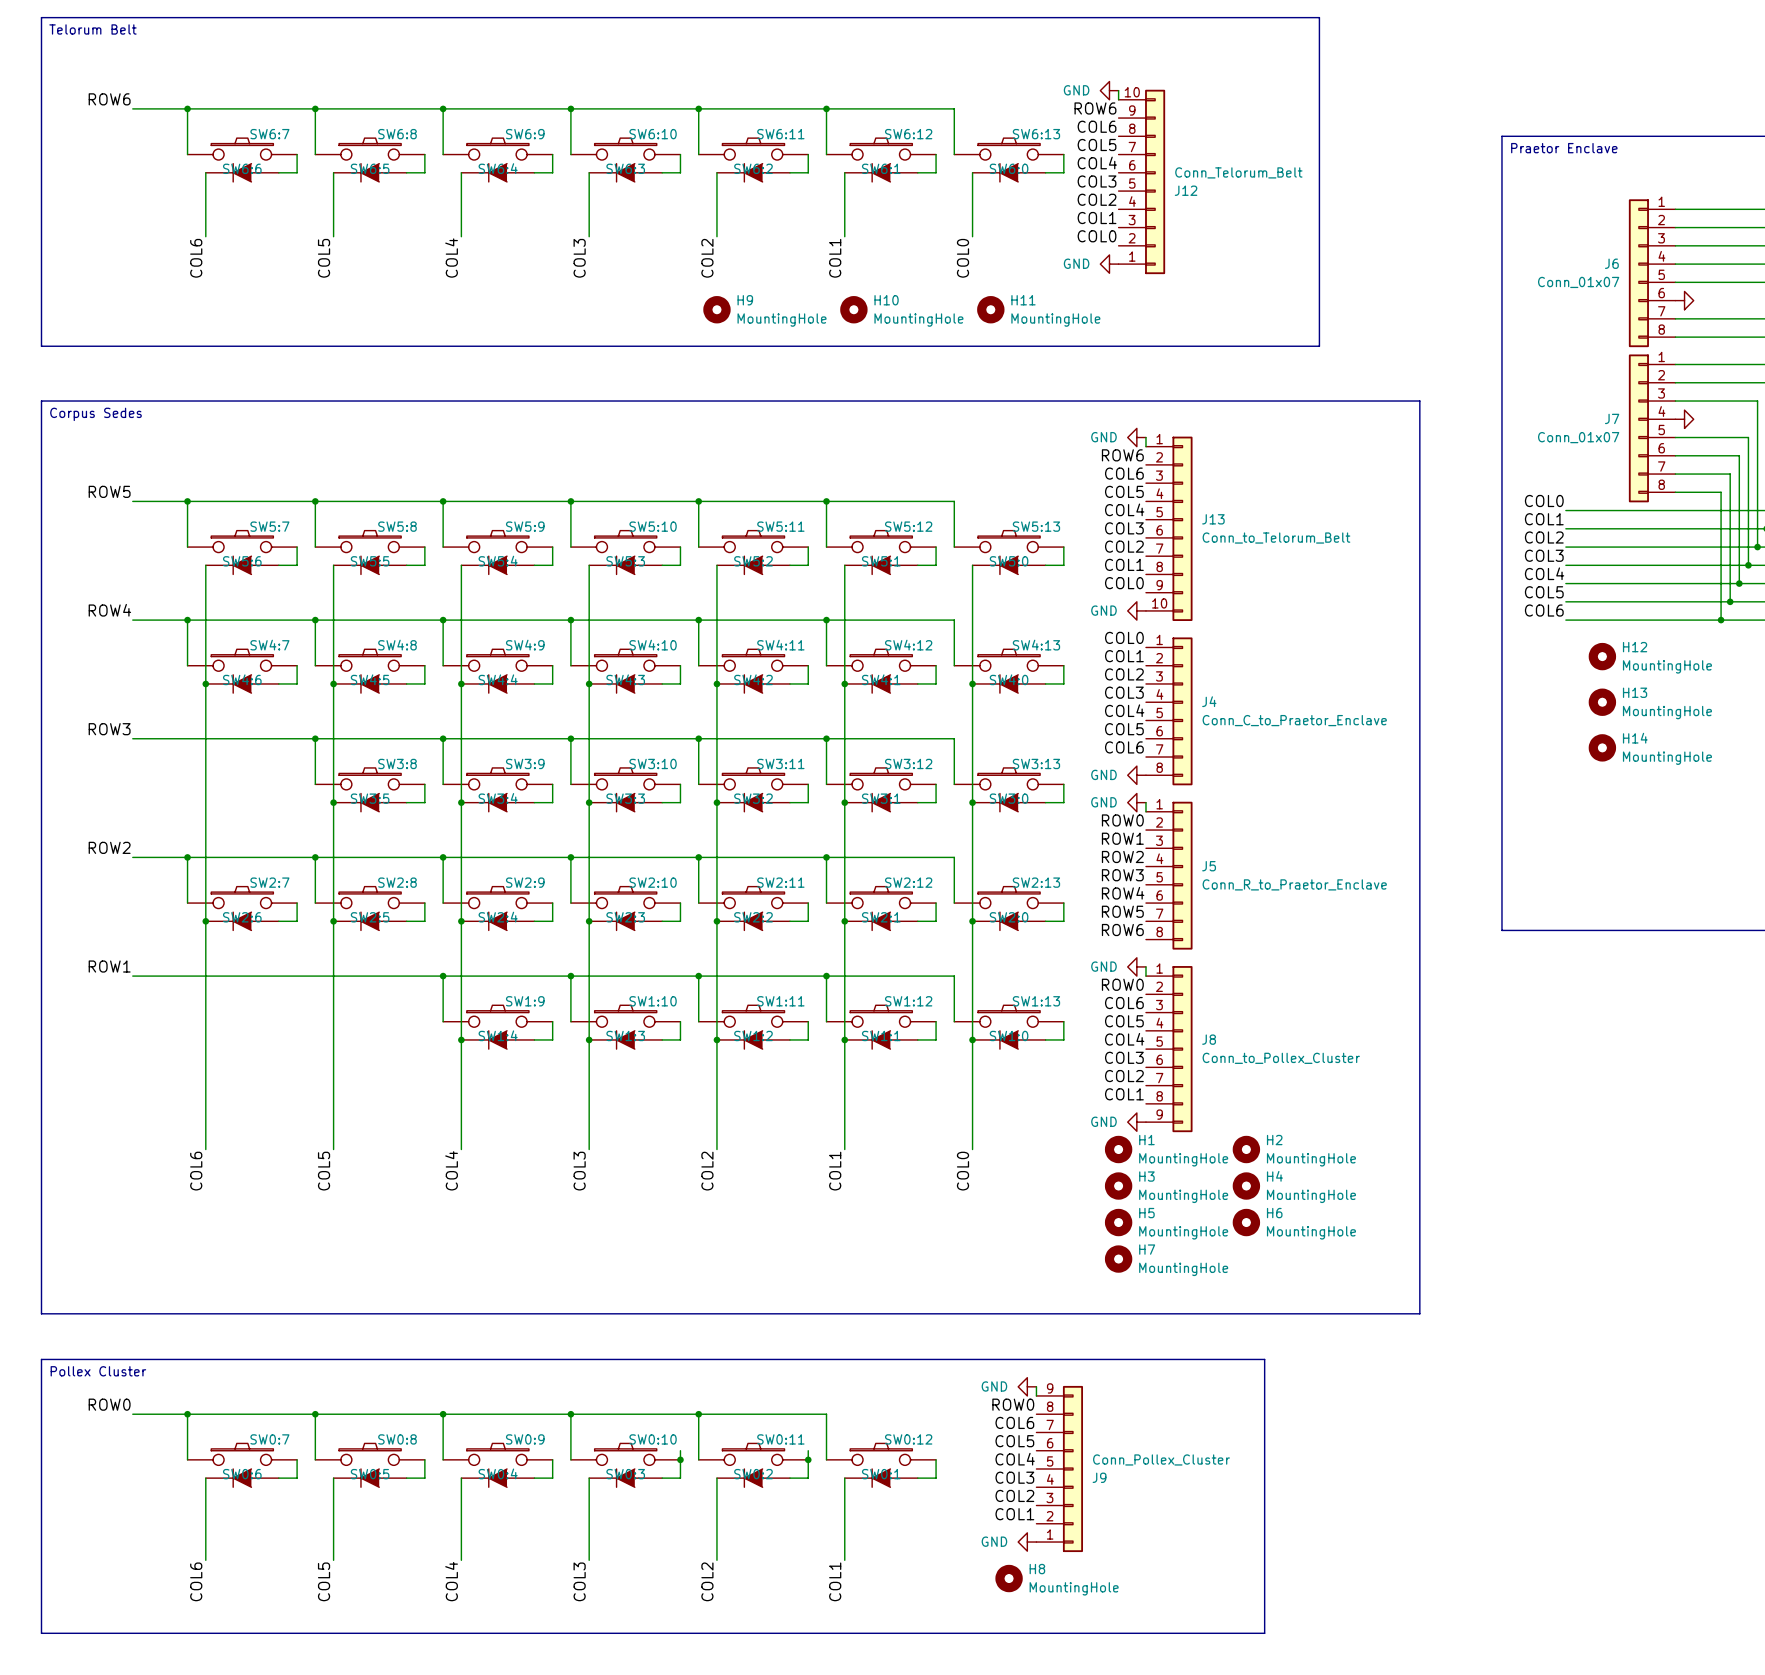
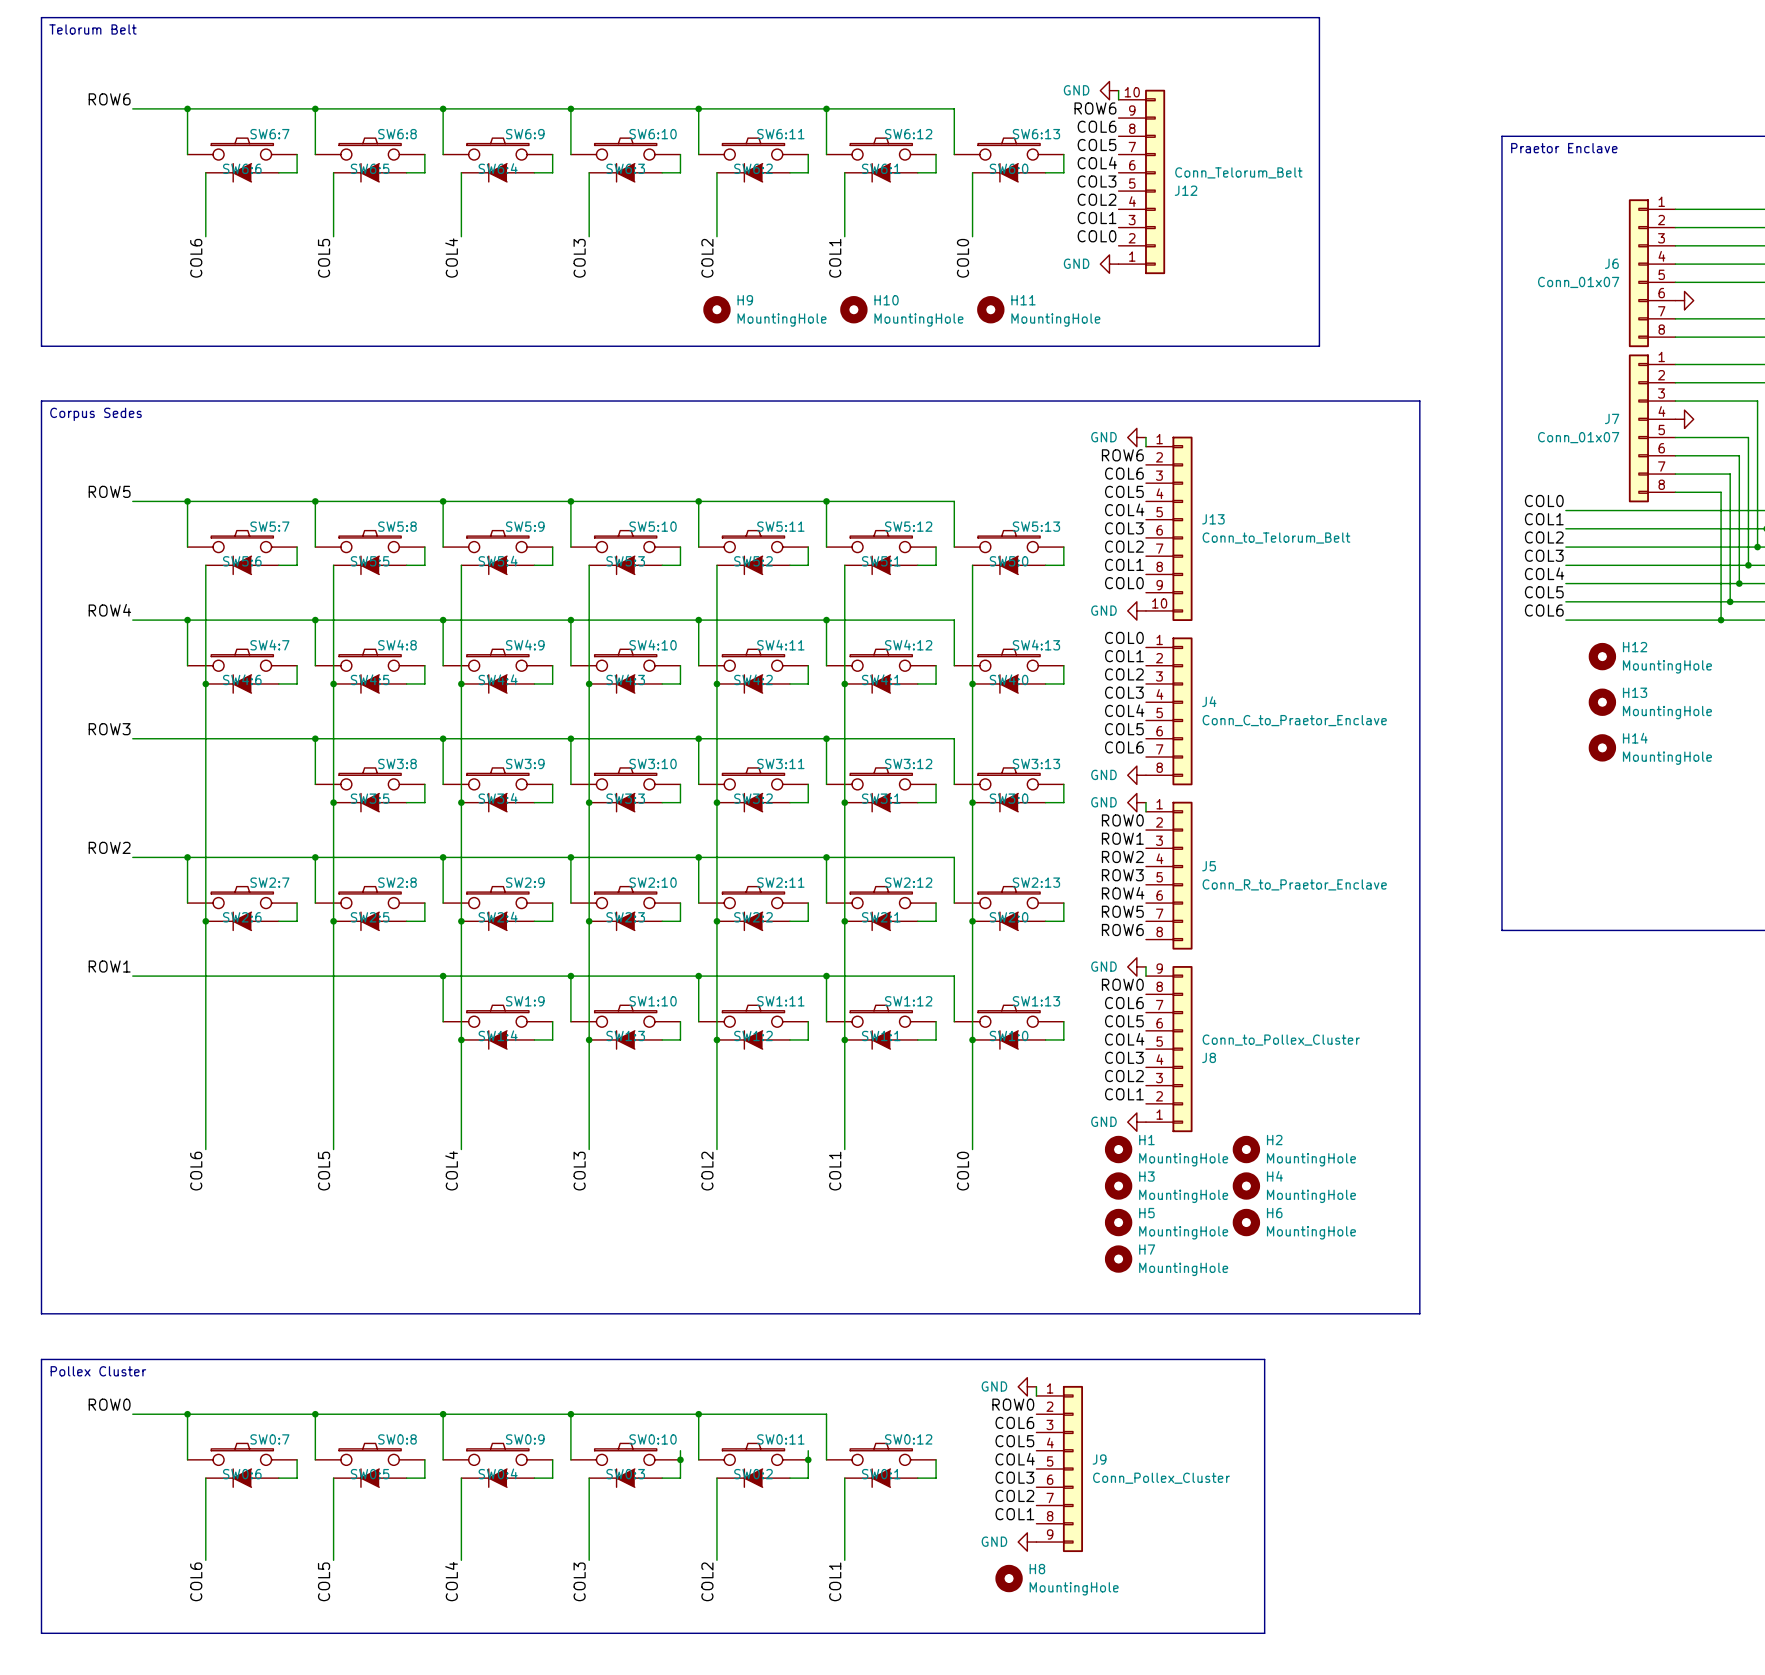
J8 flip: as is (1182, 1049) -> up-down (1182, 1049)
J9 flip: as is (1072, 1468) -> up-down (1072, 1468)

